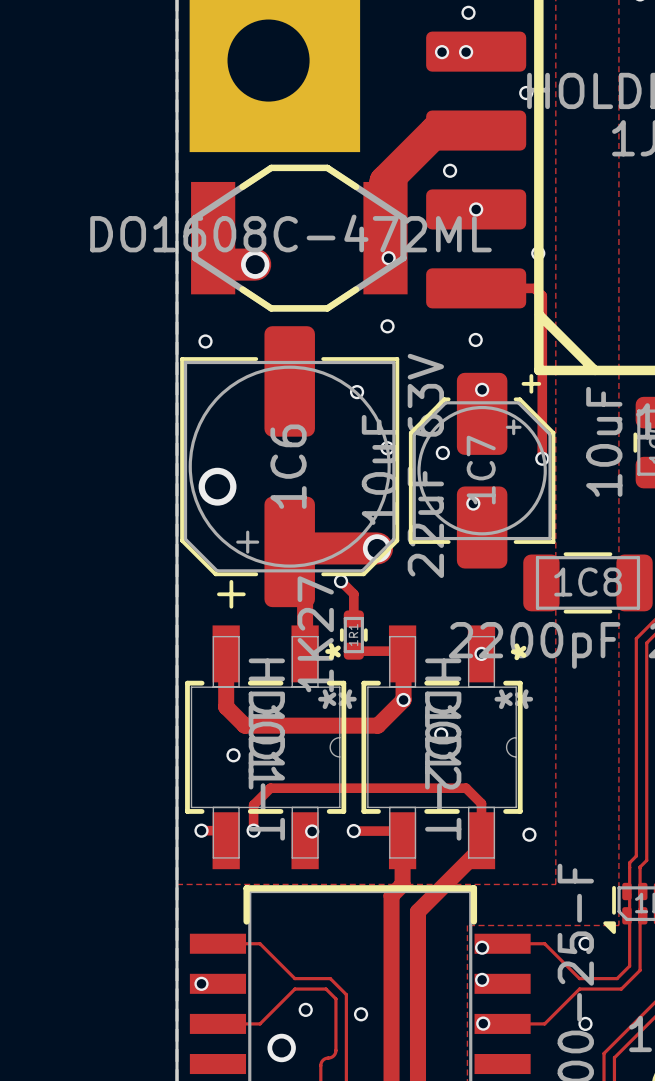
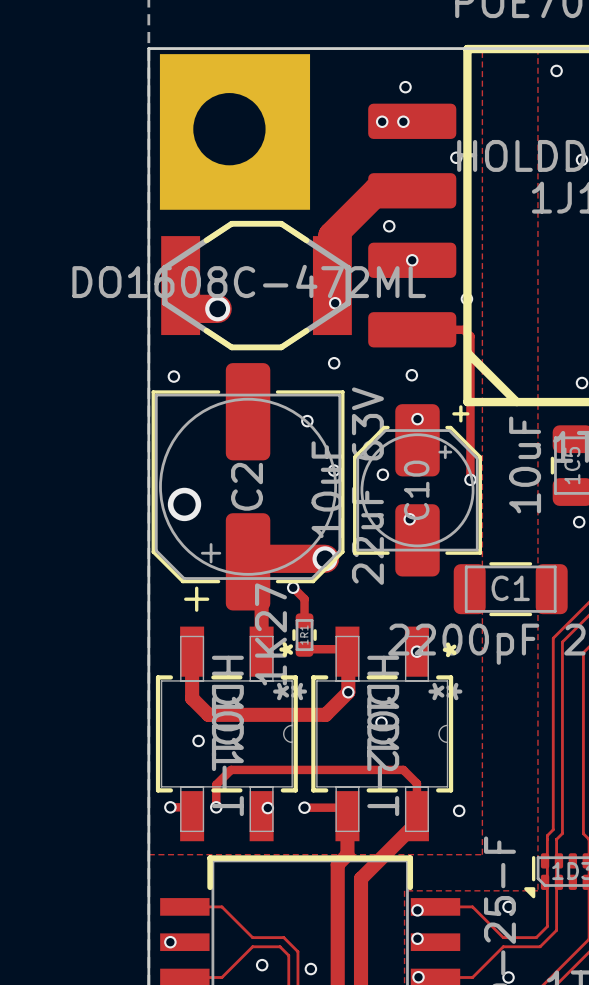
1C6 name: 1C6 (288, 466) -> C2 (247, 486)
1C7 name: 1C7 (481, 470) -> C10 (416, 490)
1C8 name: 1C8 (587, 581) -> C1 (510, 588)

